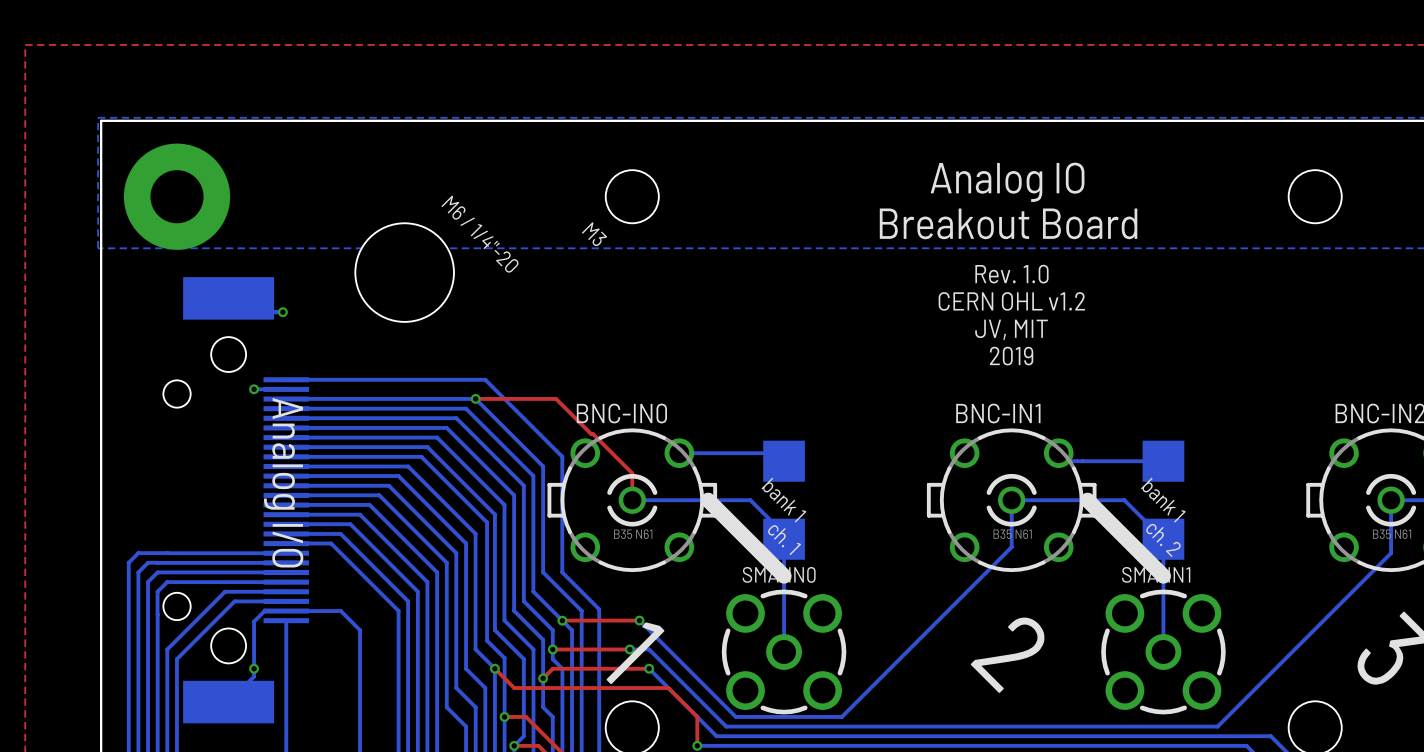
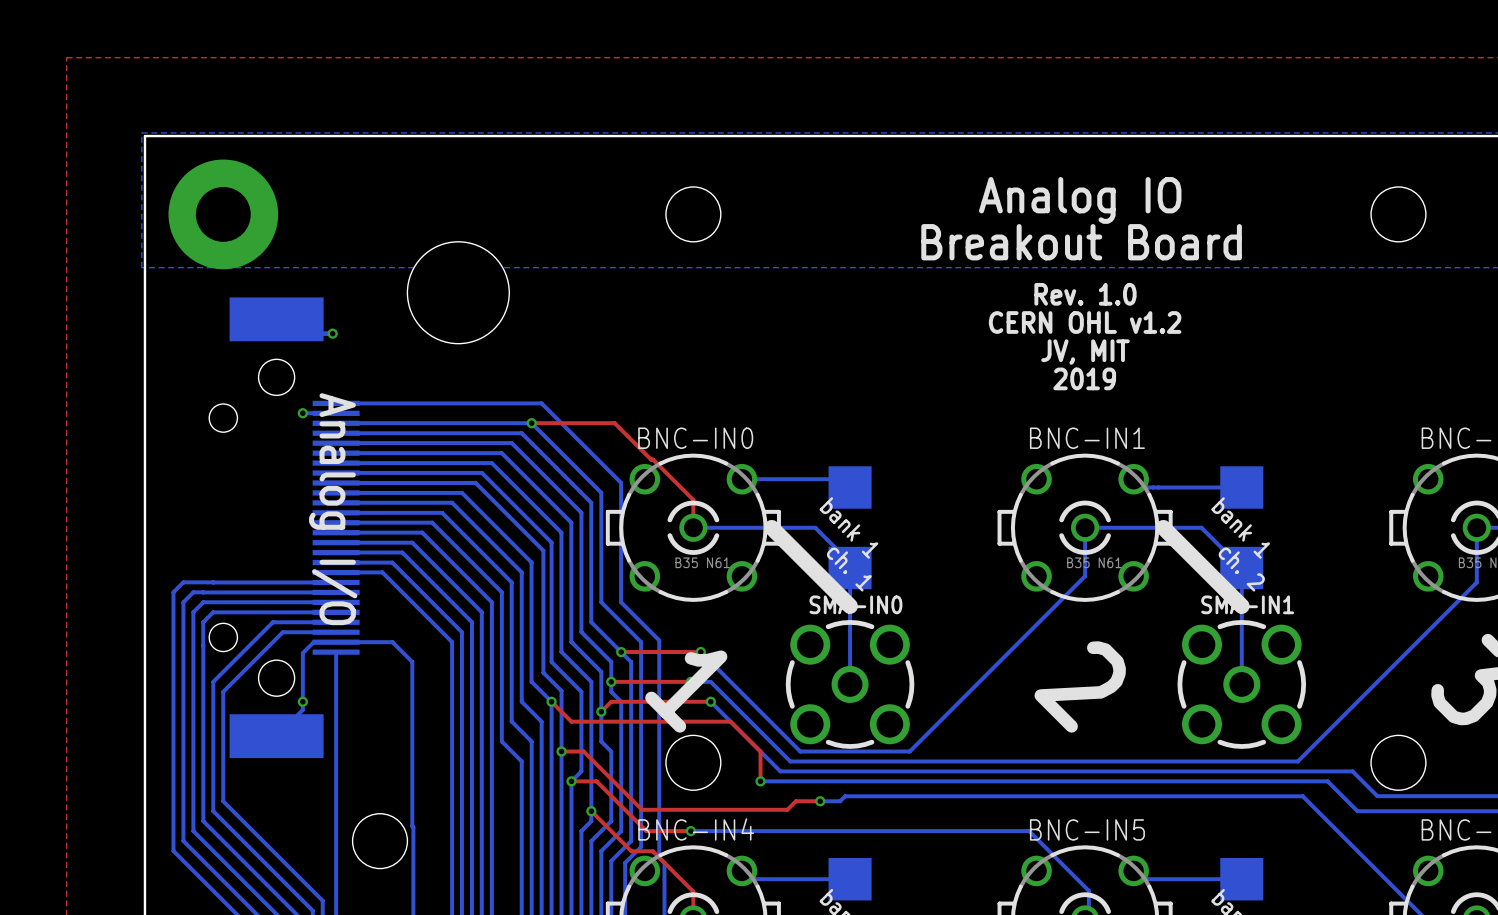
text: M6 / 1/4"-20 (479, 234) -> none
text: M3 (594, 234) -> none

